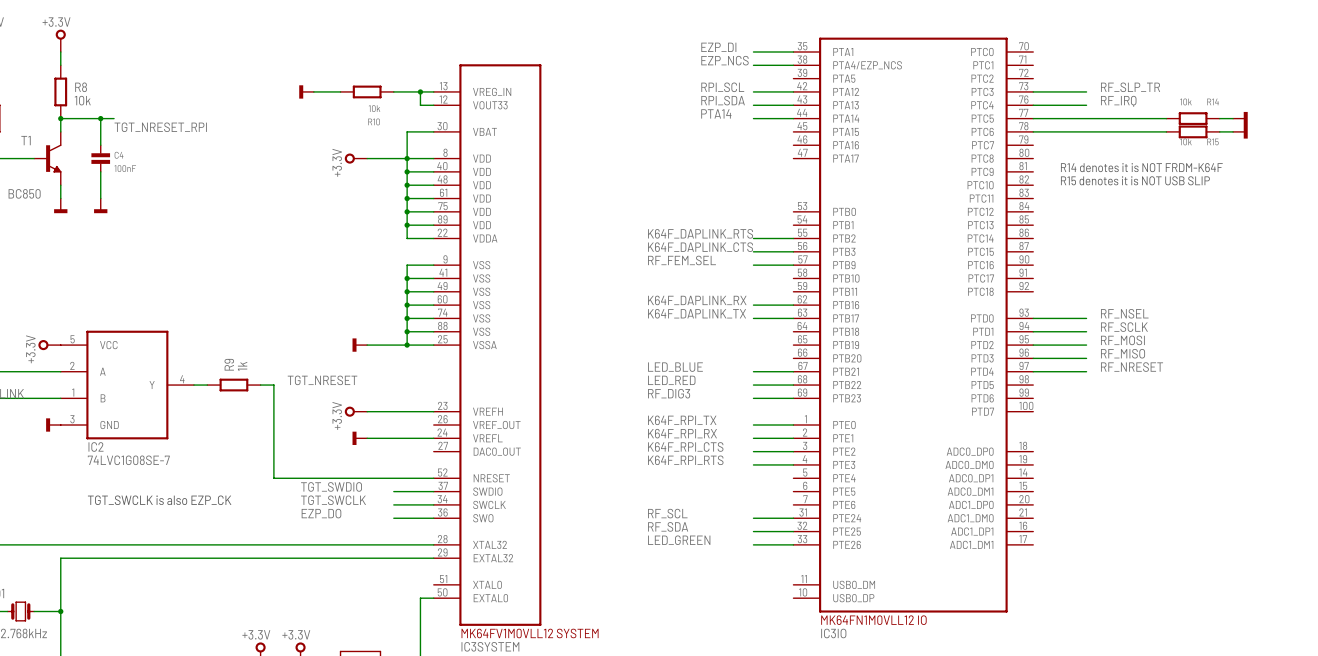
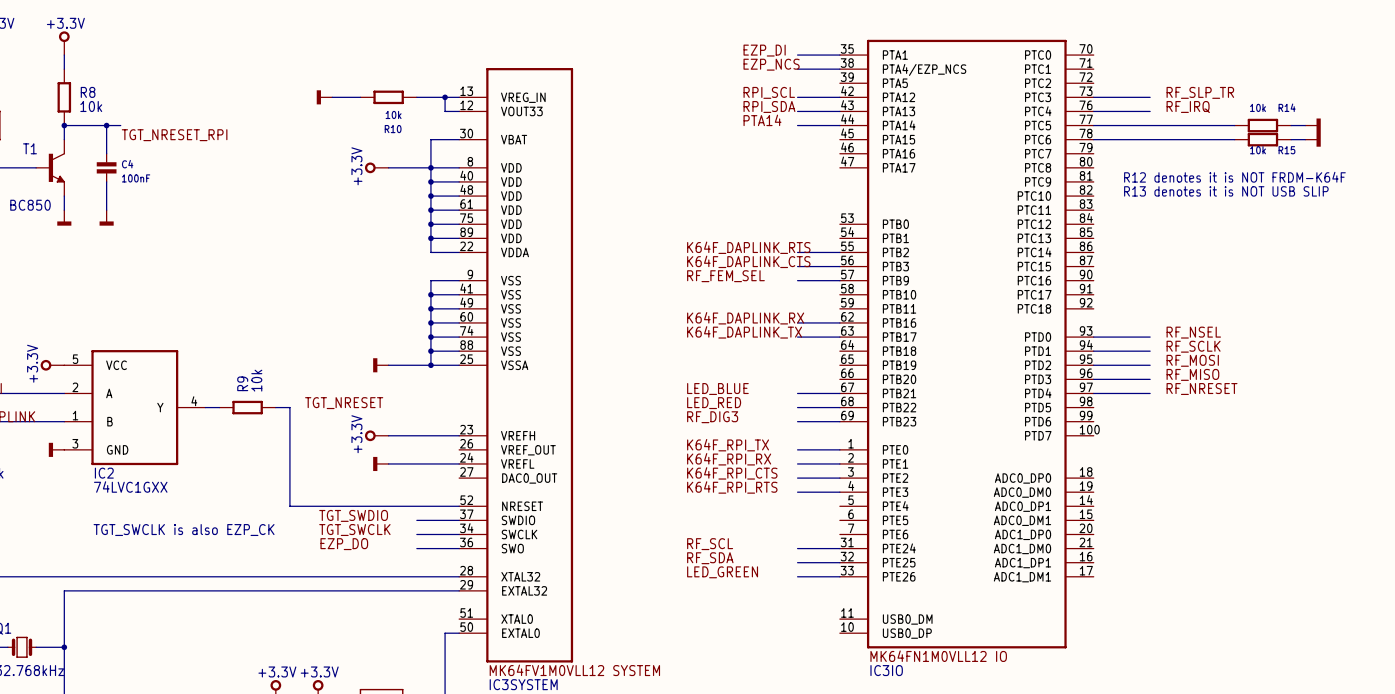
text: R14 denotes it is NOT FRDM-K64F (1141, 167) -> R12 denotes it is NOT FRDM-K64F (1234, 177)
text: R15 denotes it is NOT USB SLIP (1135, 180) -> R13 denotes it is NOT USB SLIP (1226, 191)
R9 value: 1k (242, 366) -> 10k (256, 380)
IC2 value: 74LVC1G08SE-7 (128, 460) -> 74LVC1GXX (130, 487)

